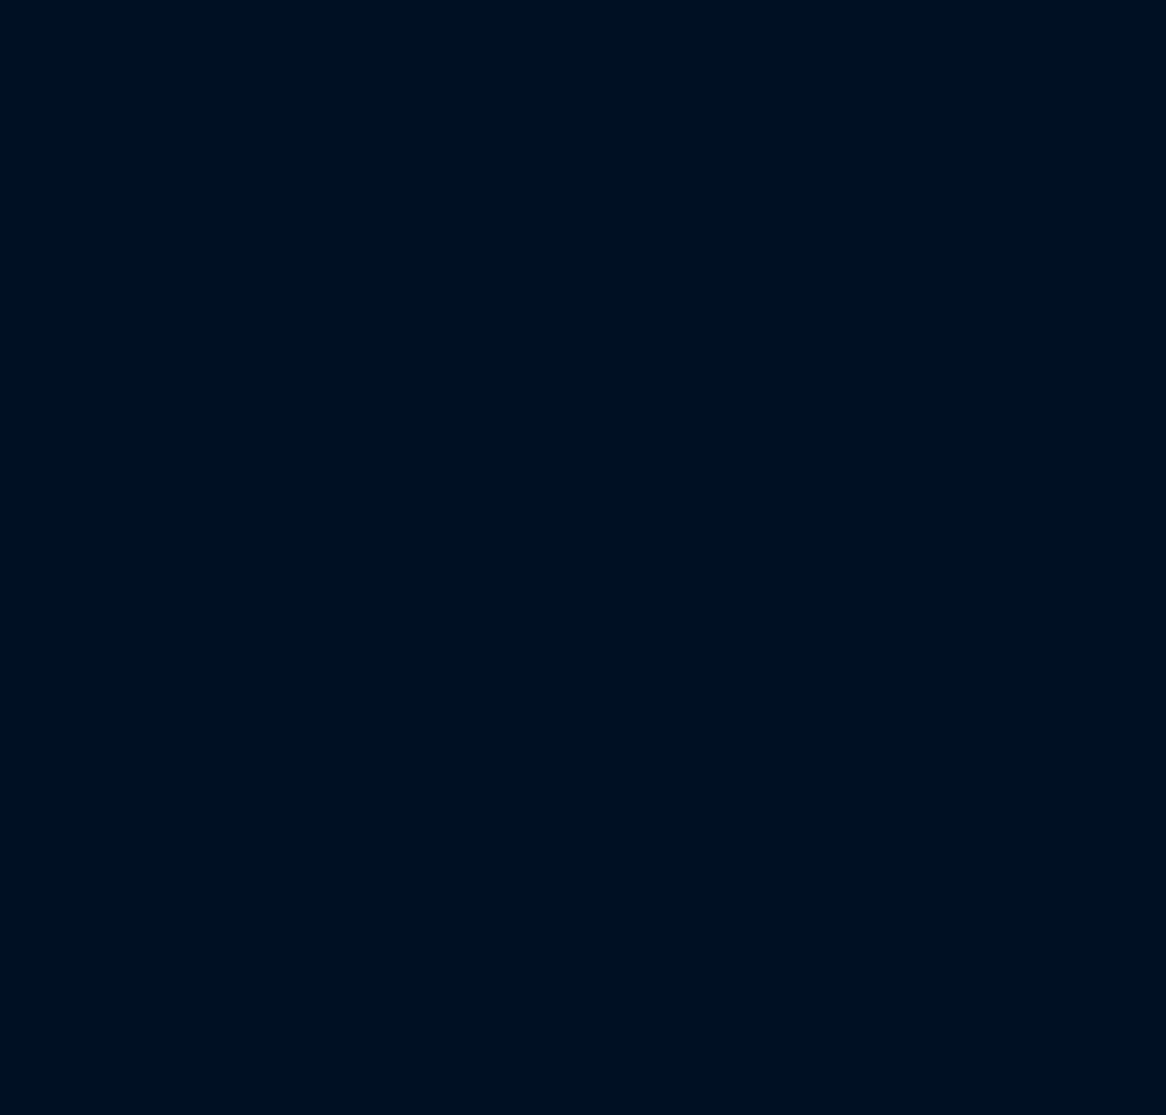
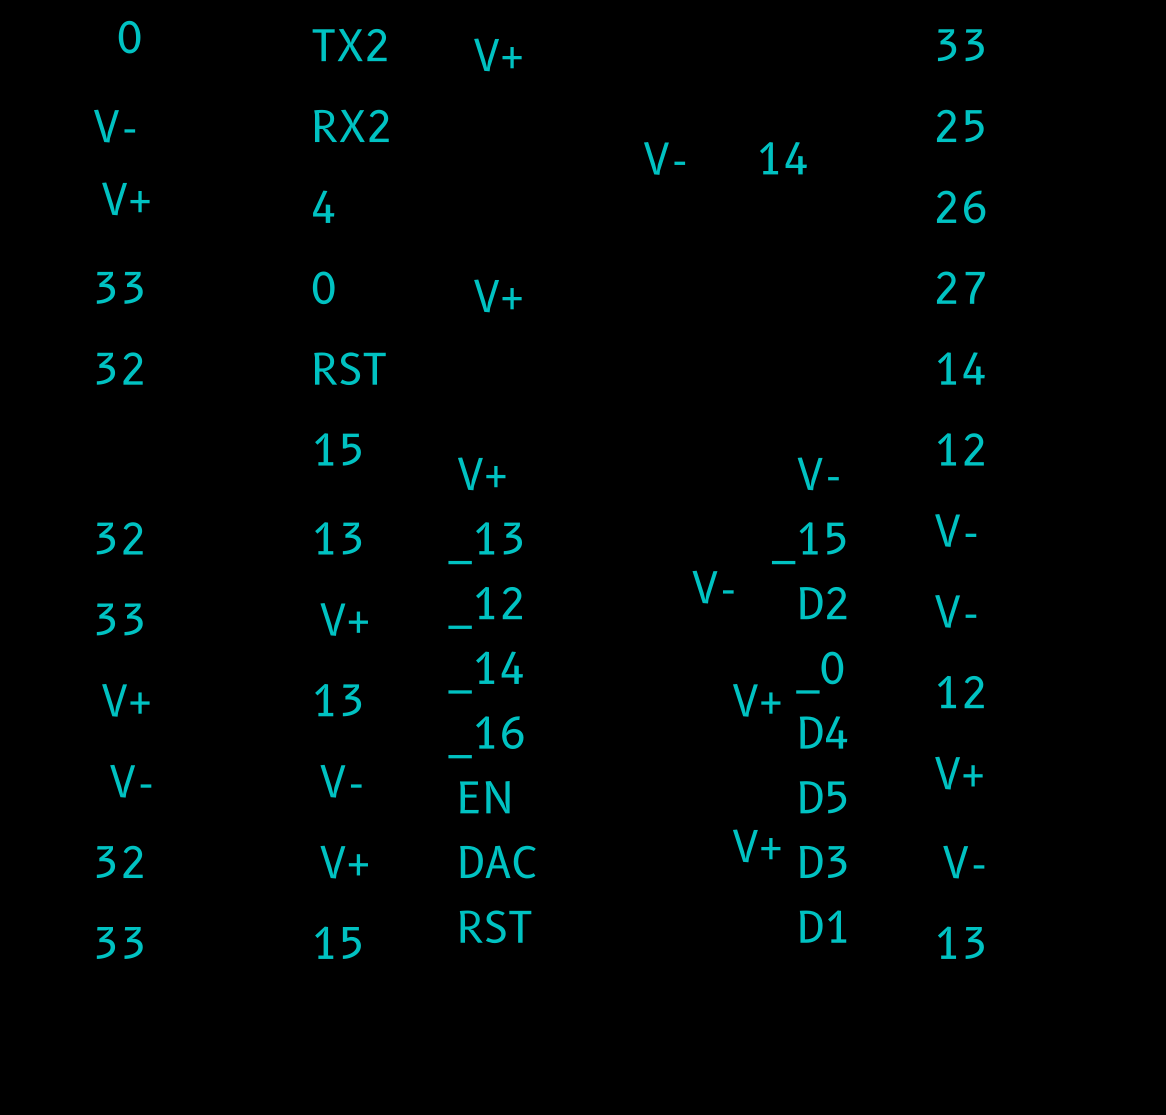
text: none -> 0 (129, 37)
text: none -> TX2 (349, 45)
text: none -> 33 (960, 45)
text: none -> V+ (497, 54)
text: none -> V- (114, 126)
text: none -> RX2 (351, 125)
text: none -> 25 (960, 125)
text: none -> 14 (783, 158)
text: none -> V- (664, 158)
text: none -> V+ (125, 198)
text: none -> 4 (323, 206)
text: none -> 26 (961, 206)
text: none -> 33 (119, 287)
text: none -> 0 (323, 287)
text: none -> 27 (960, 287)
text: none -> V+ (497, 295)
text: none -> 14 (961, 368)
text: none -> 32 (119, 368)
text: none -> RST (349, 368)
text: none -> 15 (338, 449)
text: none -> 12 (960, 449)
text: none -> V+ (481, 473)
text: none -> V- (818, 473)
text: none -> V- (955, 530)
text: none -> 32 (119, 538)
text: none -> 13 (338, 538)
text: none -> _13 (485, 543)
text: none -> _15 (808, 543)
text: none -> V- (713, 587)
text: none -> D2 (823, 603)
text: none -> _12 (485, 607)
text: none -> V- (955, 611)
text: none -> 33 (119, 619)
text: none -> V+ (344, 619)
text: none -> _14 (485, 672)
text: none -> _0 (819, 672)
text: none -> 12 (960, 692)
text: none -> V+ (125, 700)
text: none -> 13 (338, 700)
text: none -> V+ (756, 700)
text: none -> D4 (823, 732)
text: none -> _16 (485, 737)
text: none -> V+ (958, 773)
text: none -> V- (130, 781)
text: none -> V- (341, 781)
text: none -> EN (484, 797)
text: none -> D5 (823, 797)
text: none -> V+ (756, 845)
text: none -> 32 (119, 861)
text: none -> V+ (344, 862)
text: none -> DAC (497, 862)
text: none -> D3 (823, 861)
text: none -> V- (963, 862)
text: none -> RST (495, 926)
text: none -> D1 (823, 926)
text: none -> 33 (119, 942)
text: none -> 15 (338, 942)
text: none -> 13 (960, 942)

